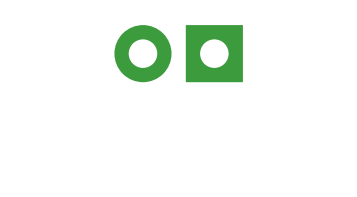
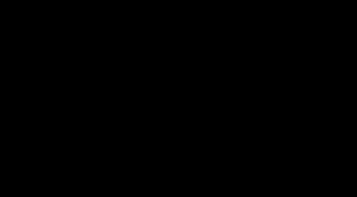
part: (178, 53) -> none

